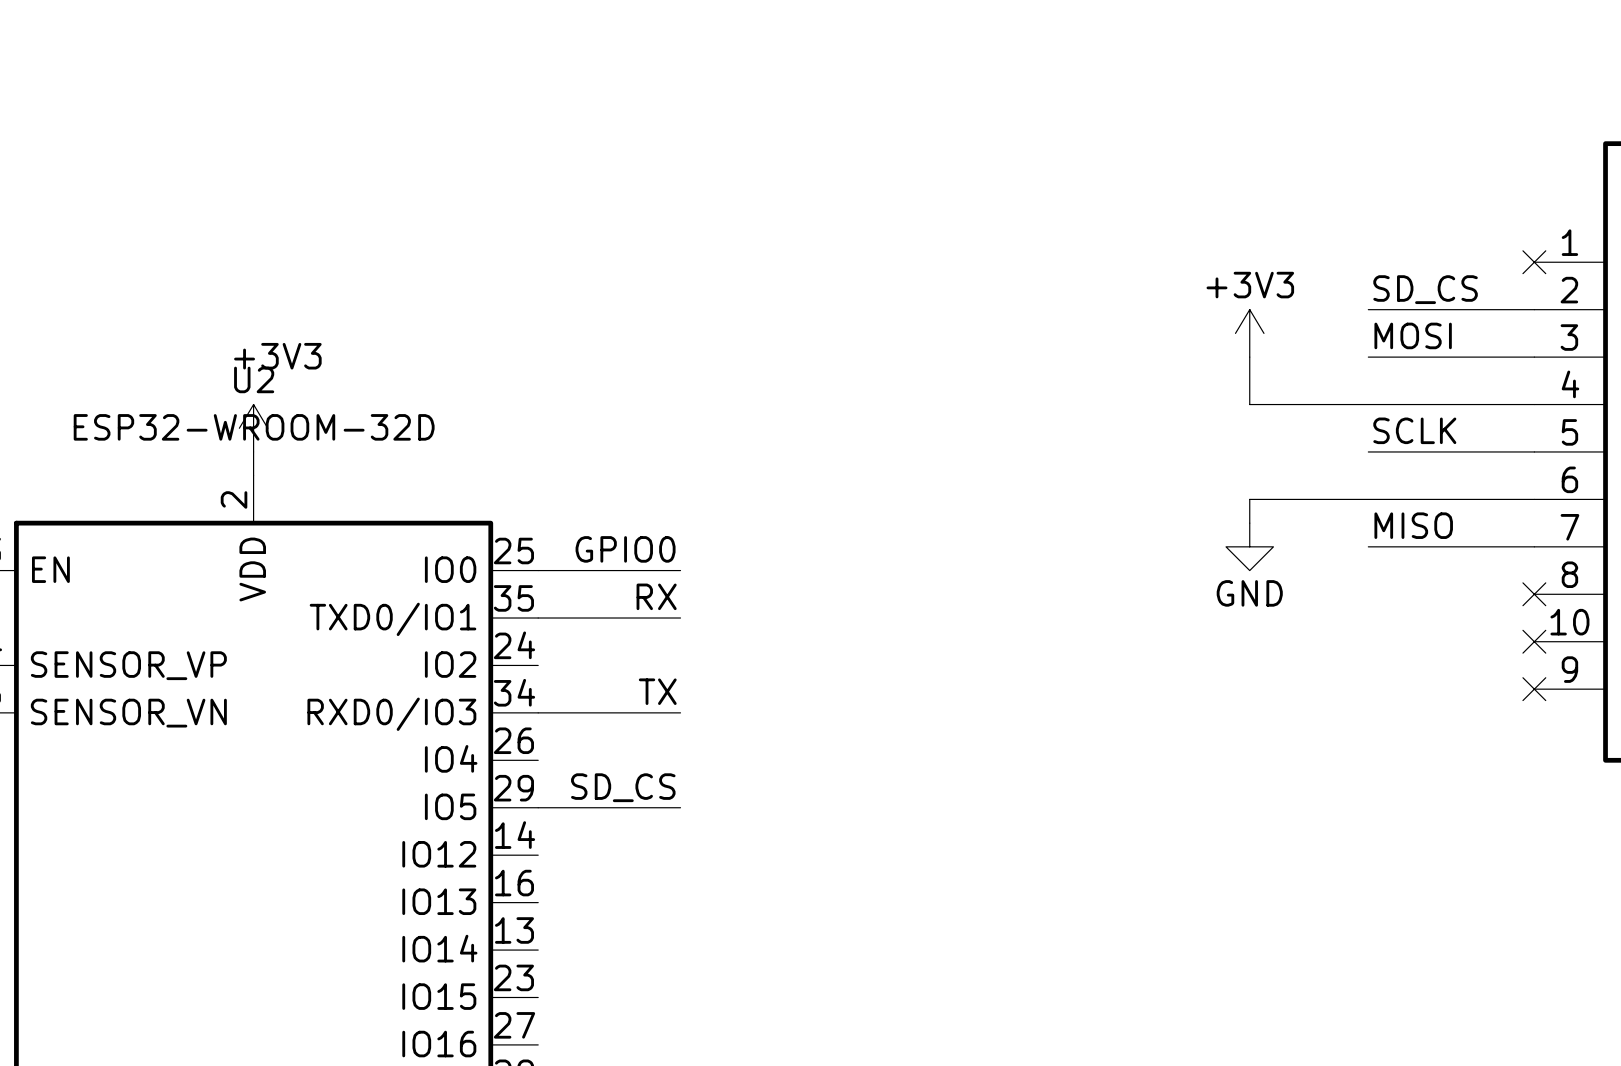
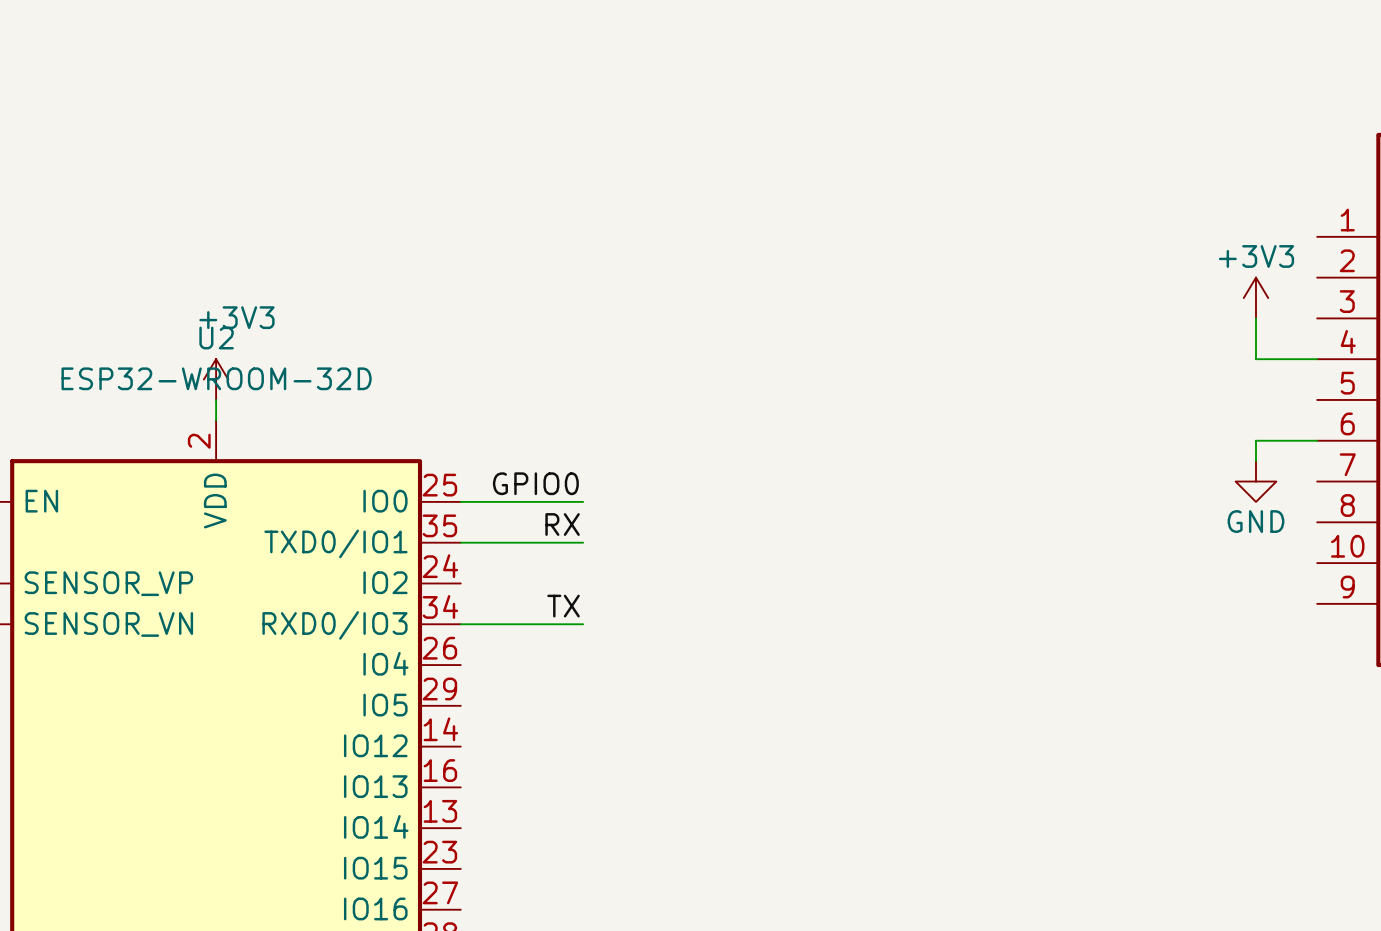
no-connect mark: (1534, 262) -> none
label: SD_CS (1425, 289) -> none
wire: (1368, 309) (1534, 309) -> none
power symbol position: +3V3 (1249, 333) -> +3V3 (1255, 298)
label: MOSI (1413, 335) -> none
wire: (1249, 357) (1249, 404) (1463, 404) -> (1255, 318) (1255, 359)
wire: (1368, 357) (1534, 357) -> none
label: SCLK (1414, 430) -> none
wire: (1368, 451) (1534, 451) -> none
wire: (1463, 499) (1249, 499) (1249, 523) -> (1255, 440) (1255, 461)
label: MISO (1413, 525) -> none
power symbol position: GND (1249, 546) -> GND (1255, 481)
wire: (1368, 546) (1534, 546) -> none
no-connect mark: (1534, 594) -> none
no-connect mark: (1534, 641) -> none
no-connect mark: (1534, 689) -> none
label: SD_CS (623, 787) -> none
wire: (538, 807) (680, 807) -> none

